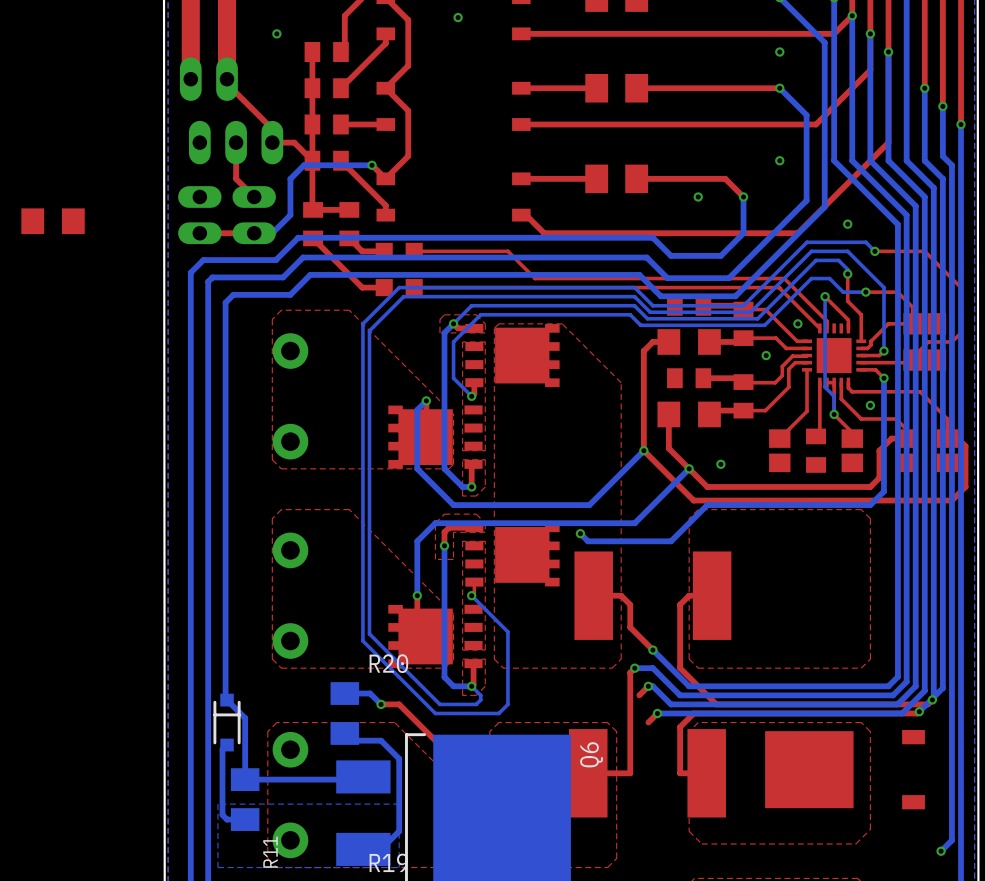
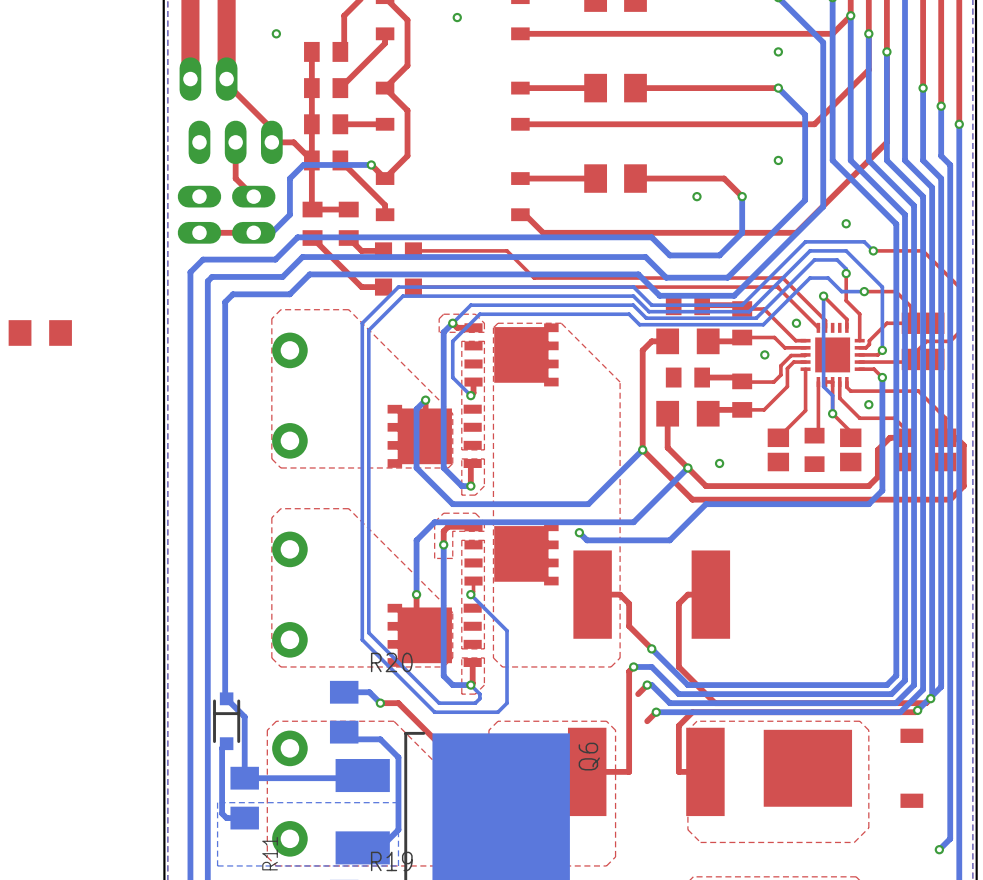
part: (53, 221) -> none
part: none -> (40, 332)
top zone outline: (861, 509) (870, 518) (870, 659) (861, 668) (698, 668) (689, 659) (689, 518) (698, 509) (861, 509) -> none

